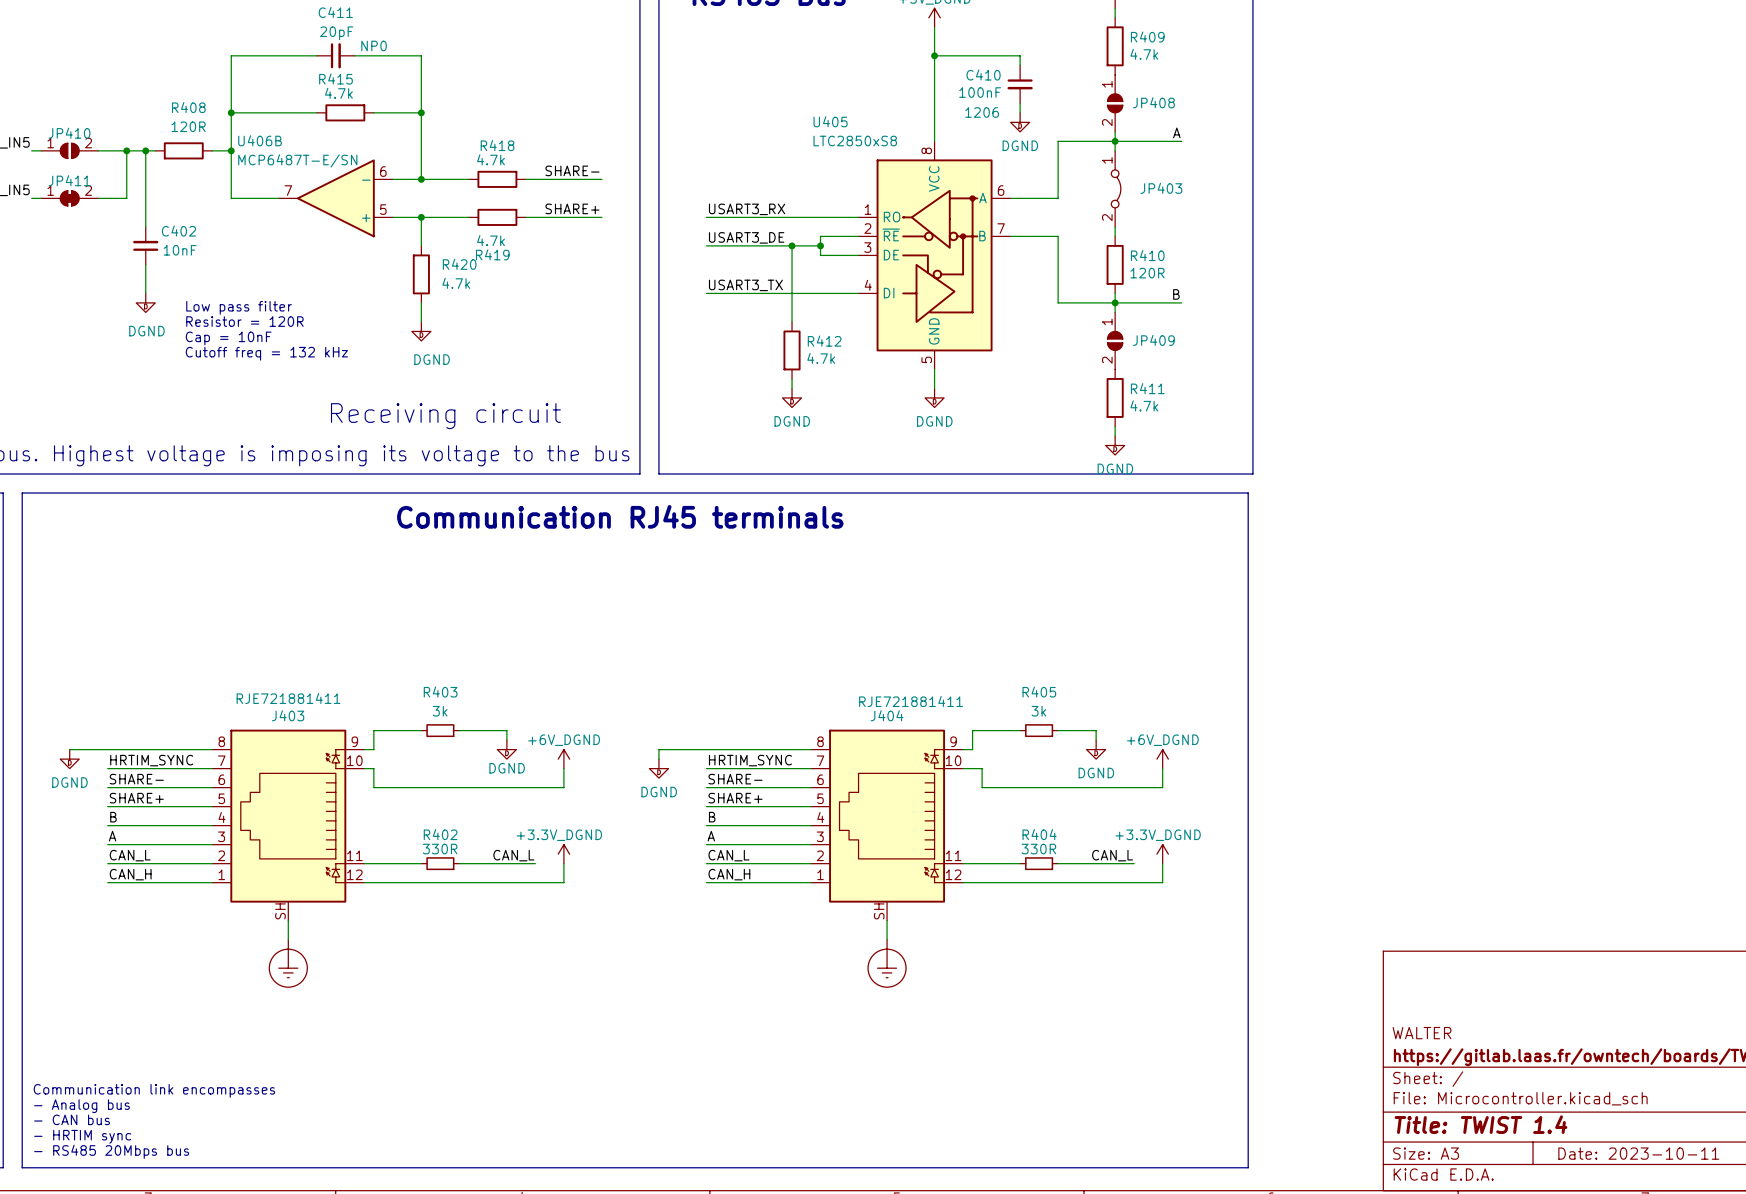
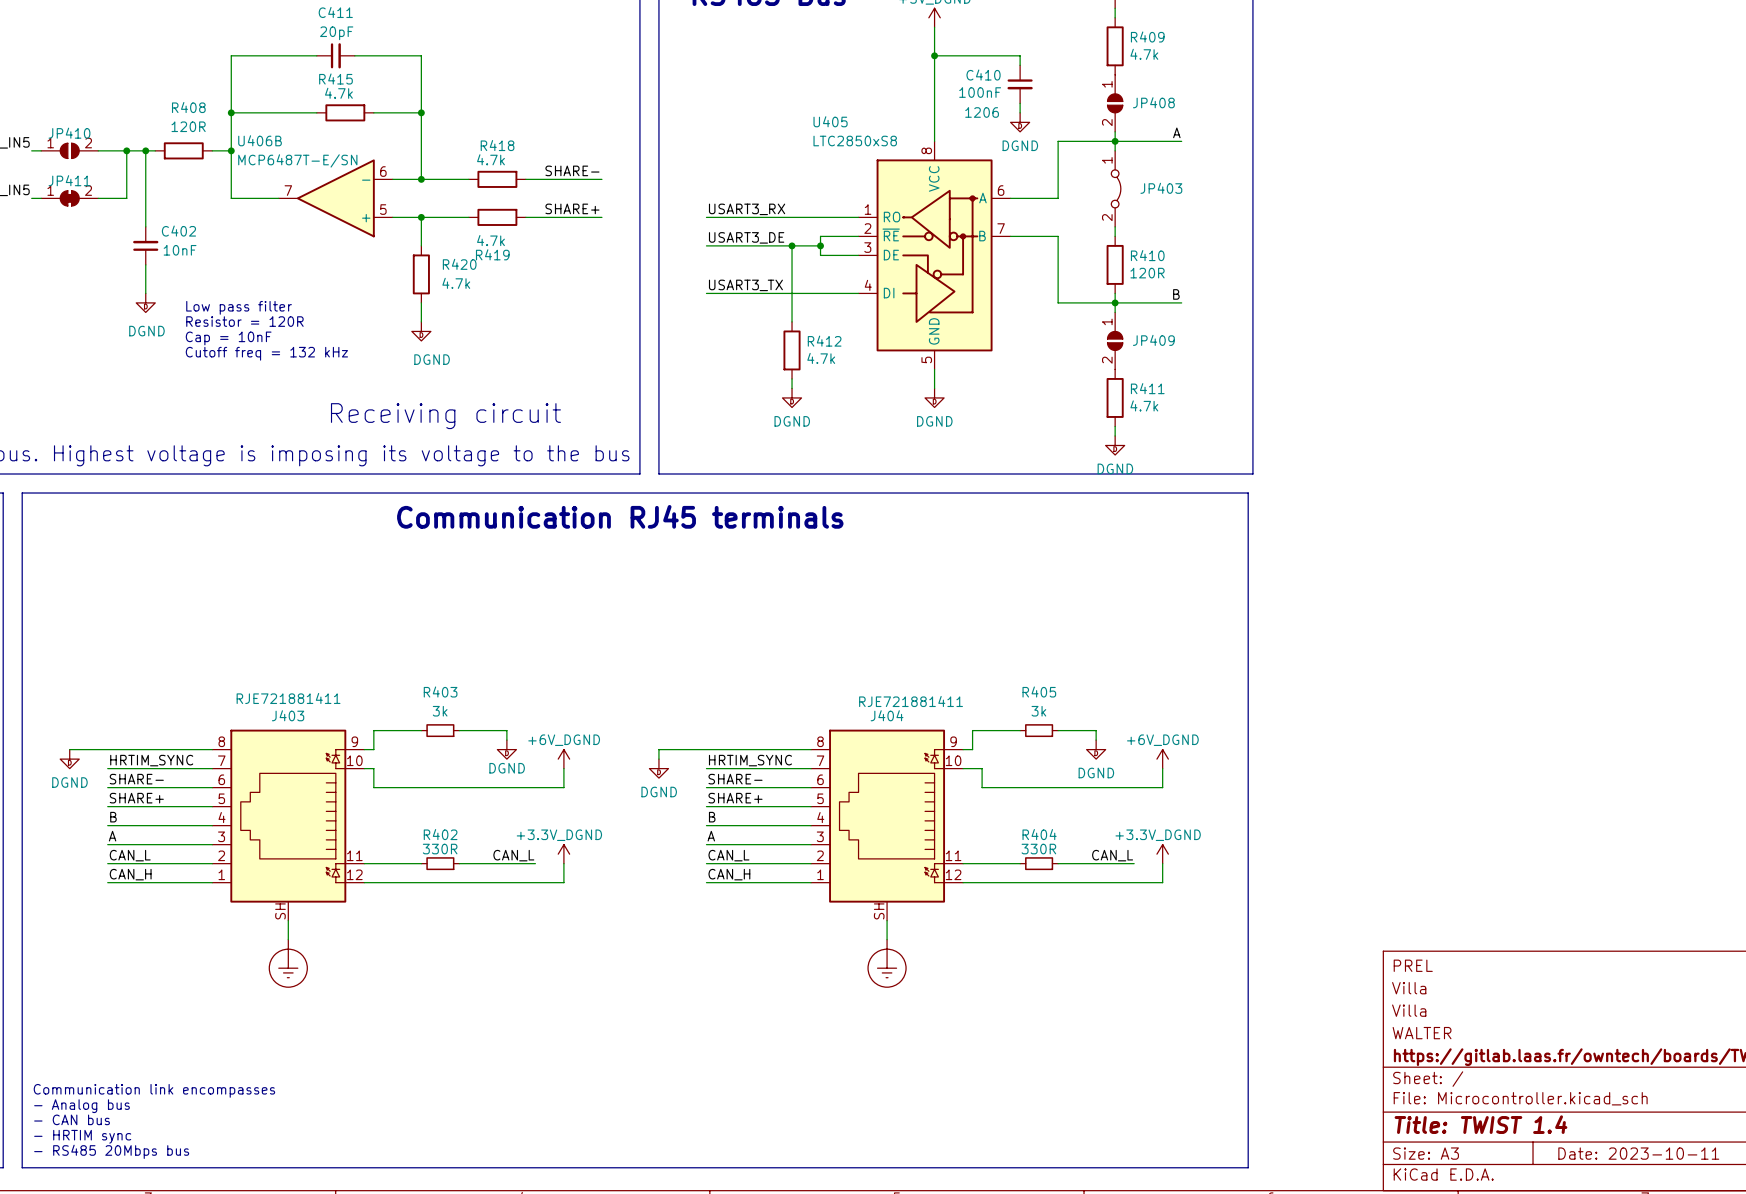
C411 text: NP0 (374, 45) -> none
title block: none -> PREL (1413, 965)
title block: none -> Villa (1409, 988)
title block: none -> Villa (1409, 1010)

